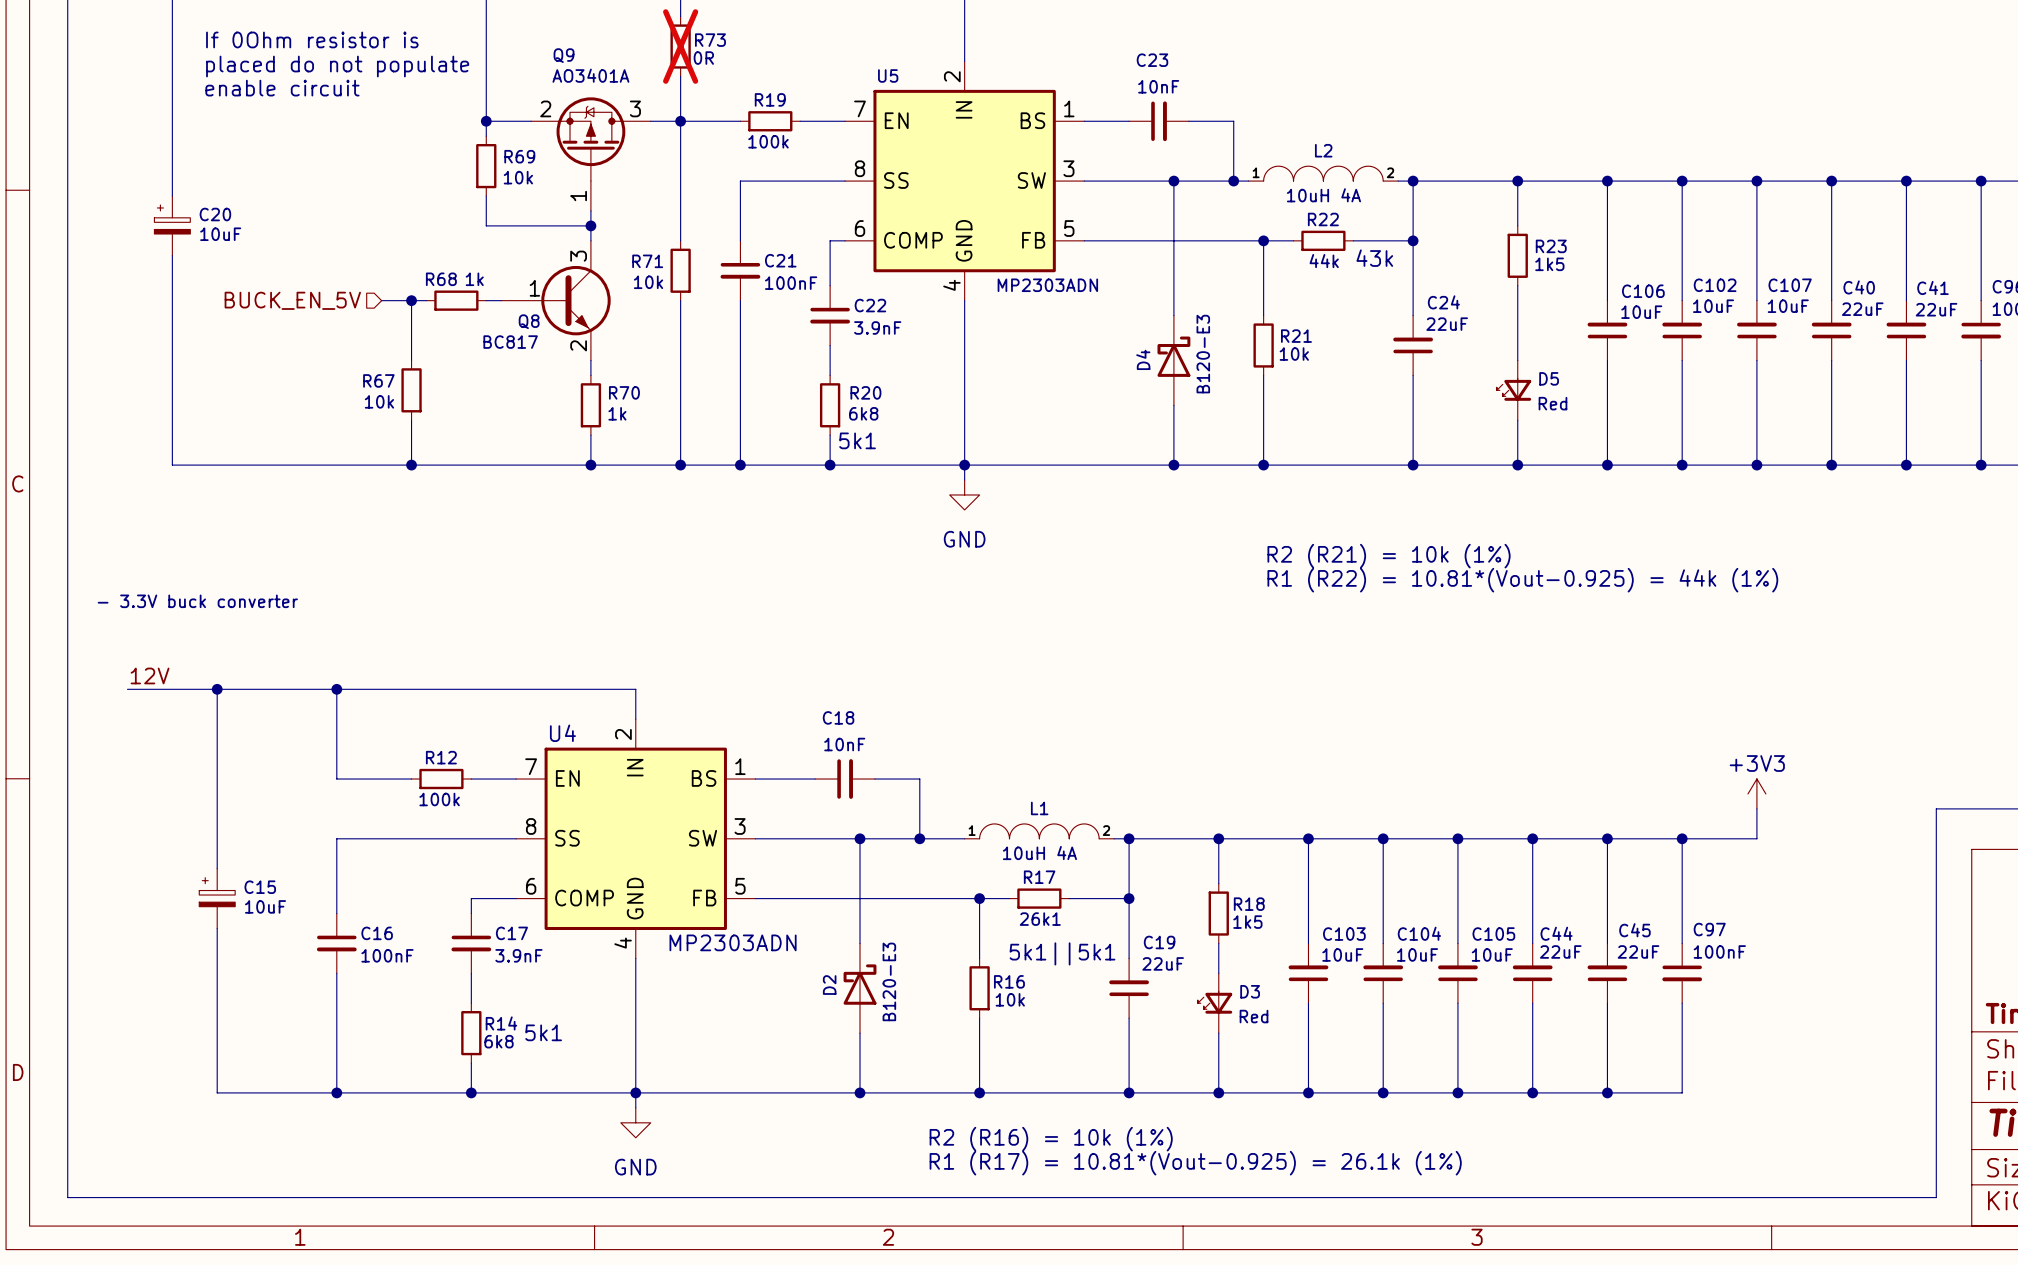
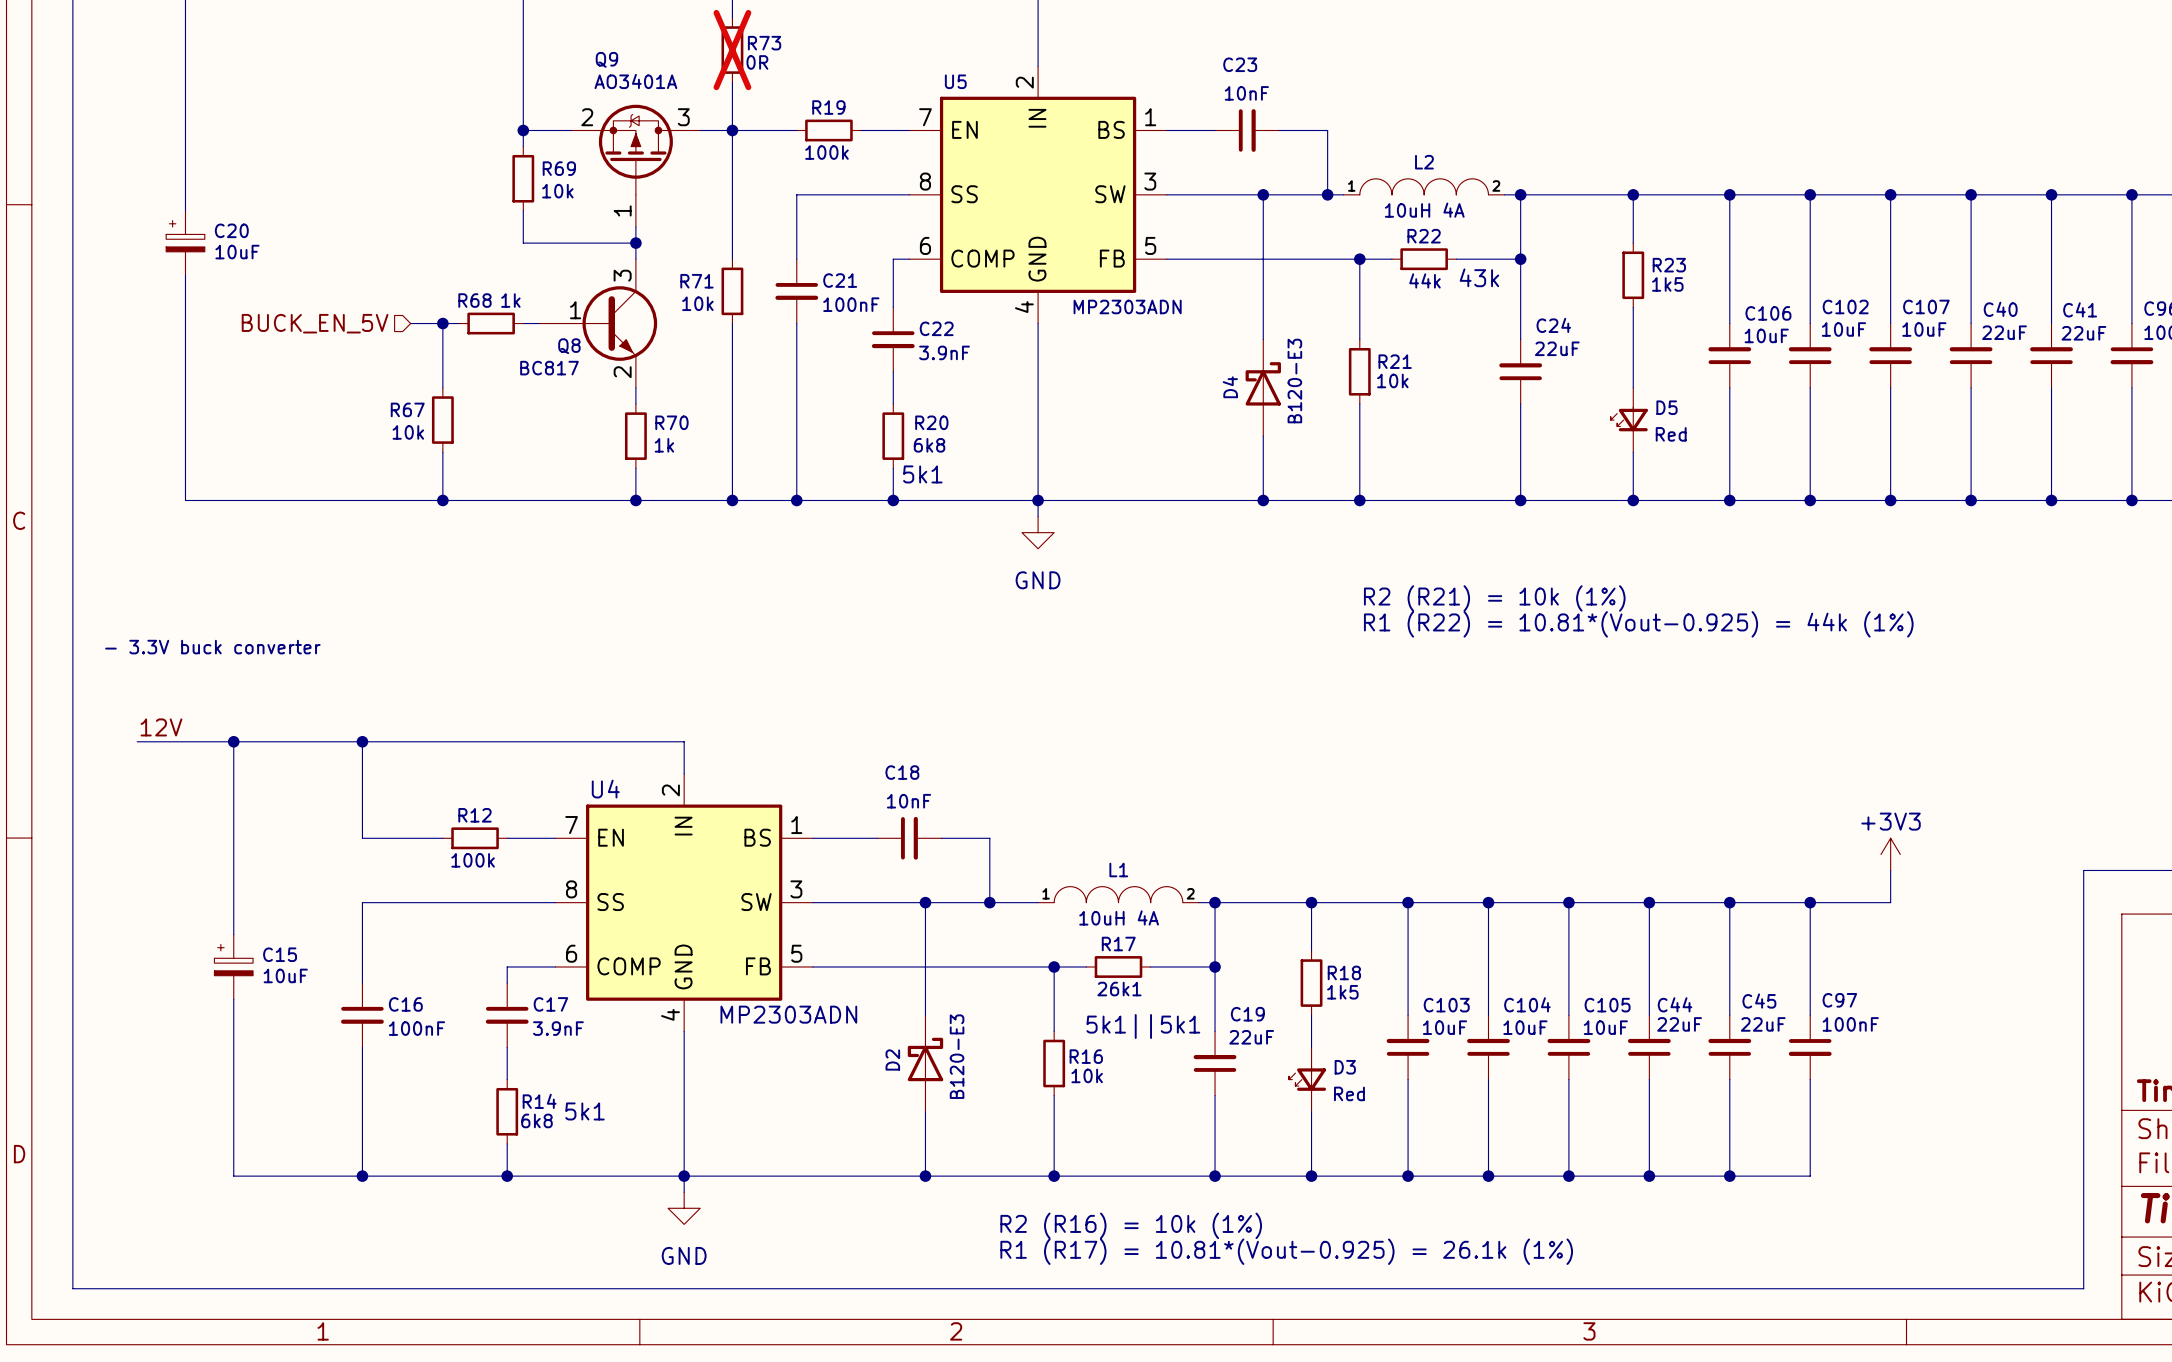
text: If 0Ohm resistor is (312, 39) -> none
text: placed do not populate (337, 66) -> none
text: enable circuit (282, 88) -> none

